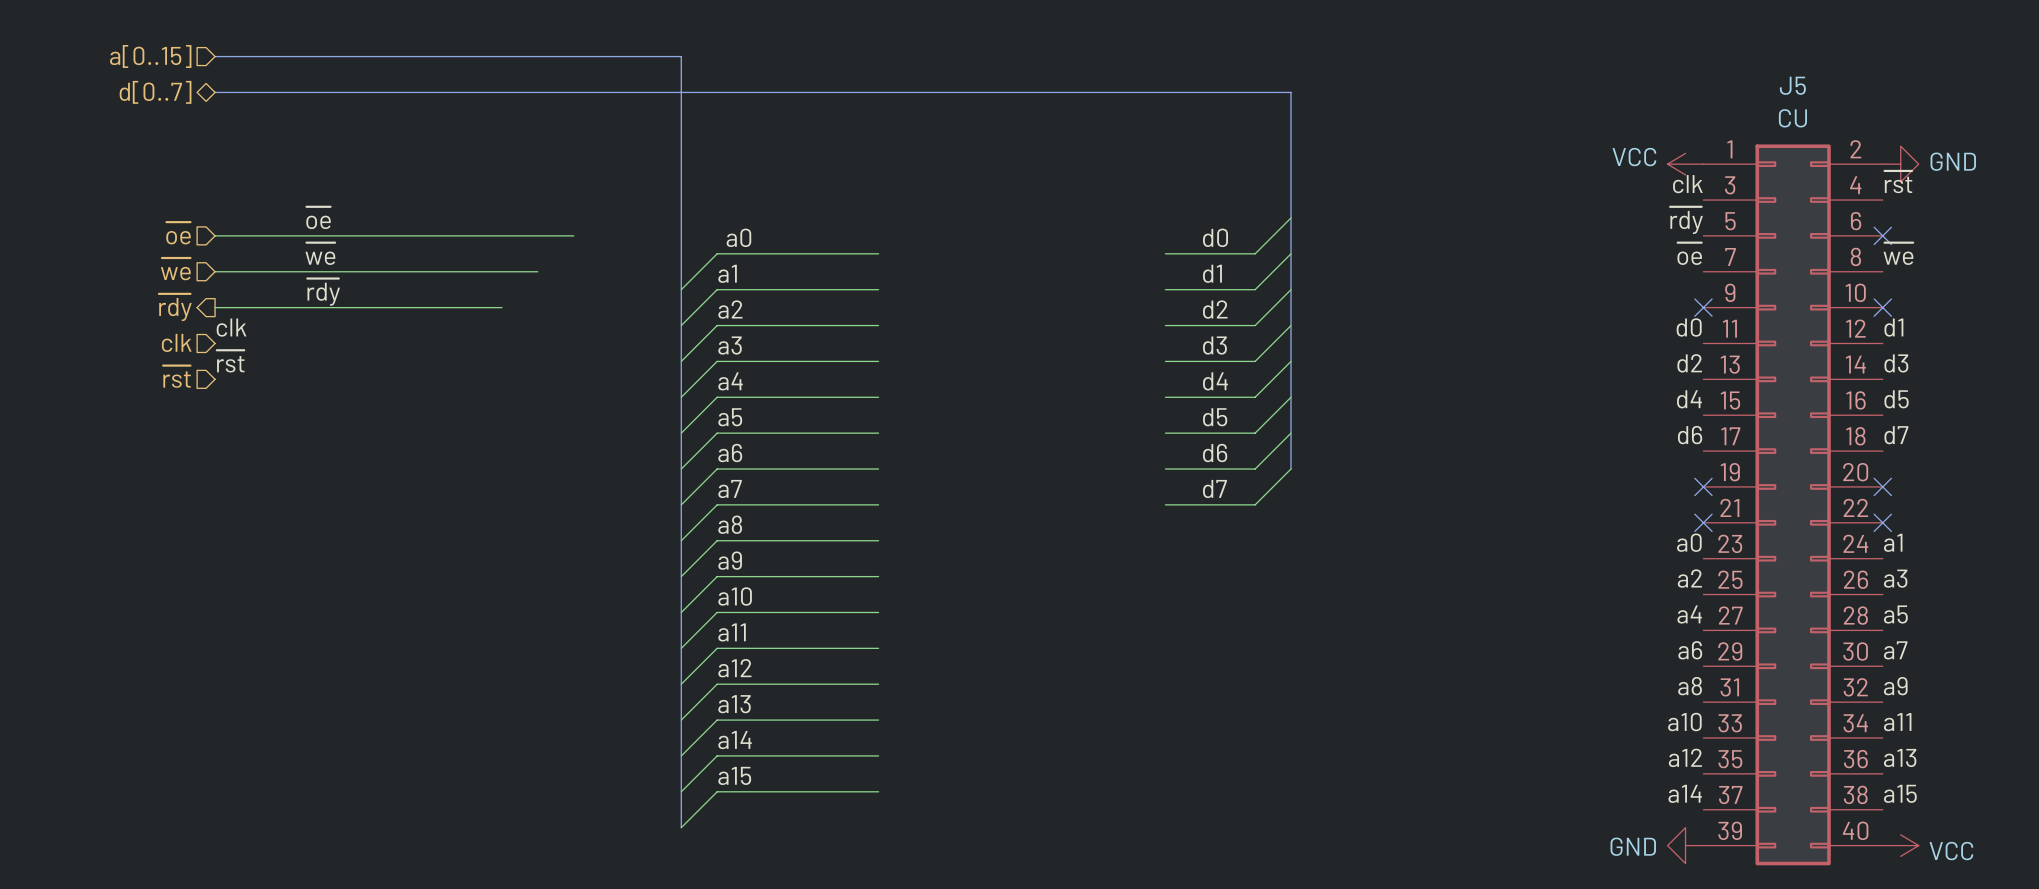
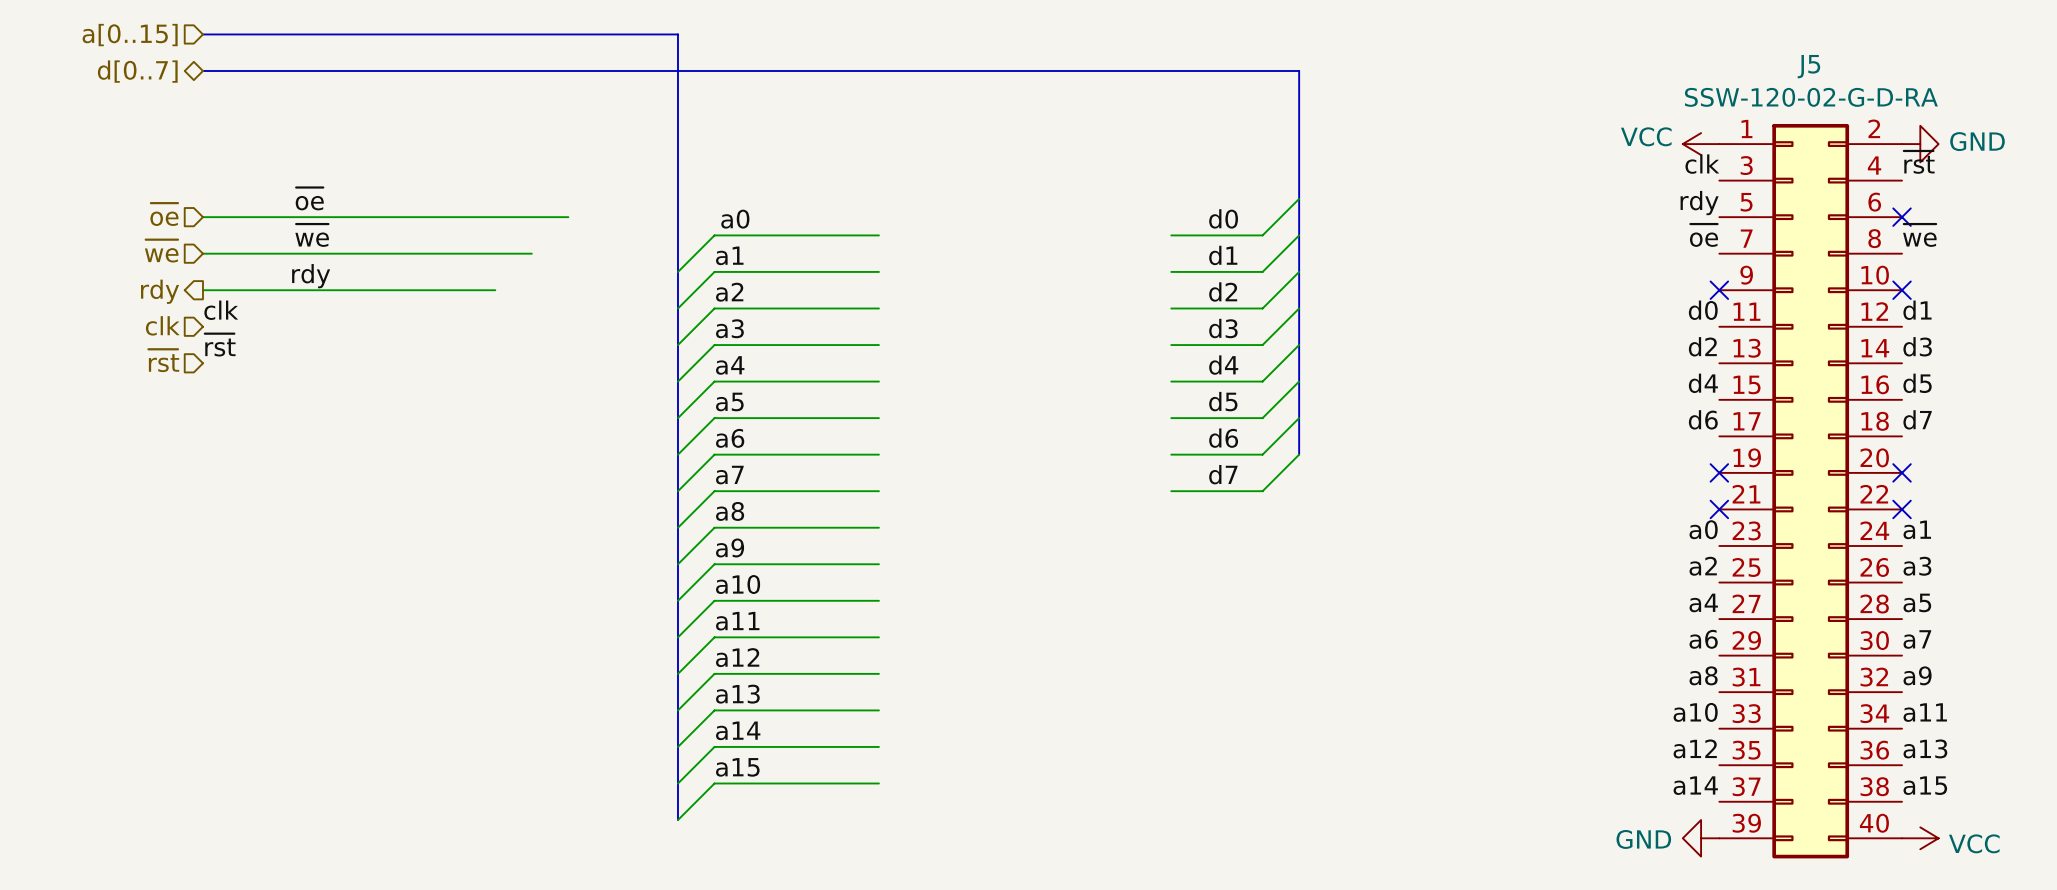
J5 value: CU (1792, 118) -> SSW-120-02-G-D-RA (1811, 97)
label: ~{rdy} (1686, 220) -> rdy (1699, 203)
label: ~{rdy} (323, 292) -> rdy (311, 276)
hierarchical label: ~{rdy} (175, 307) -> rdy (160, 291)

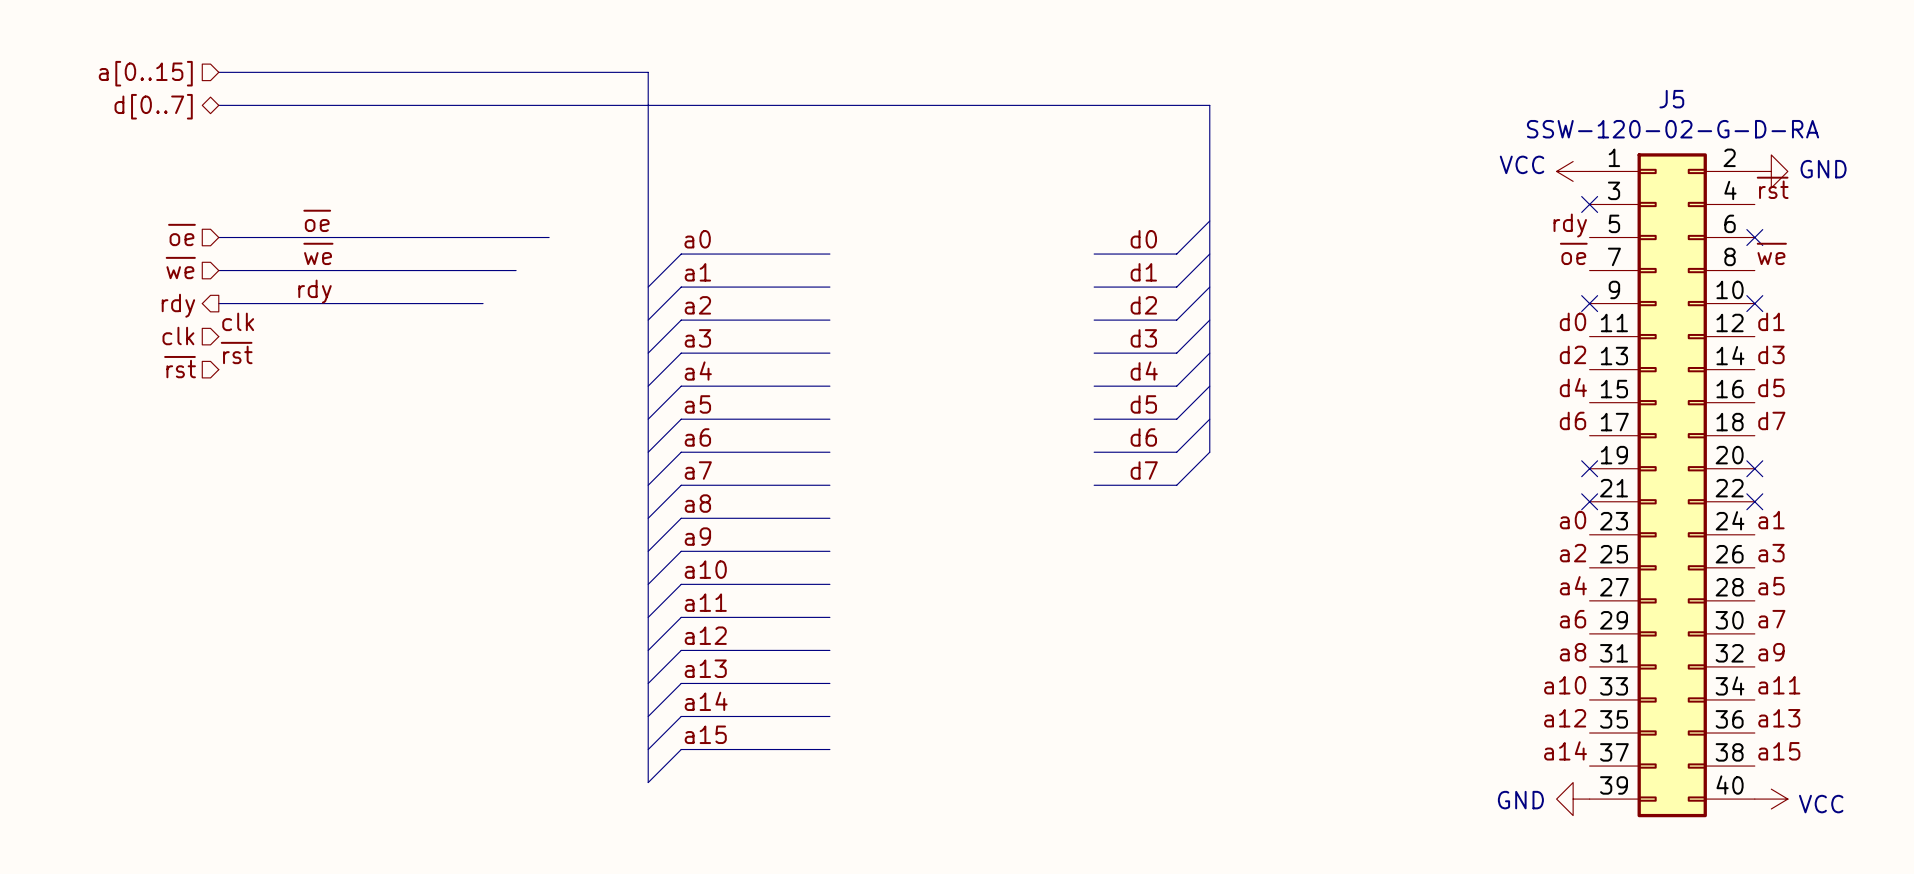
label: clk (1702, 164) -> none
no-connect mark: none -> (1589, 204)

